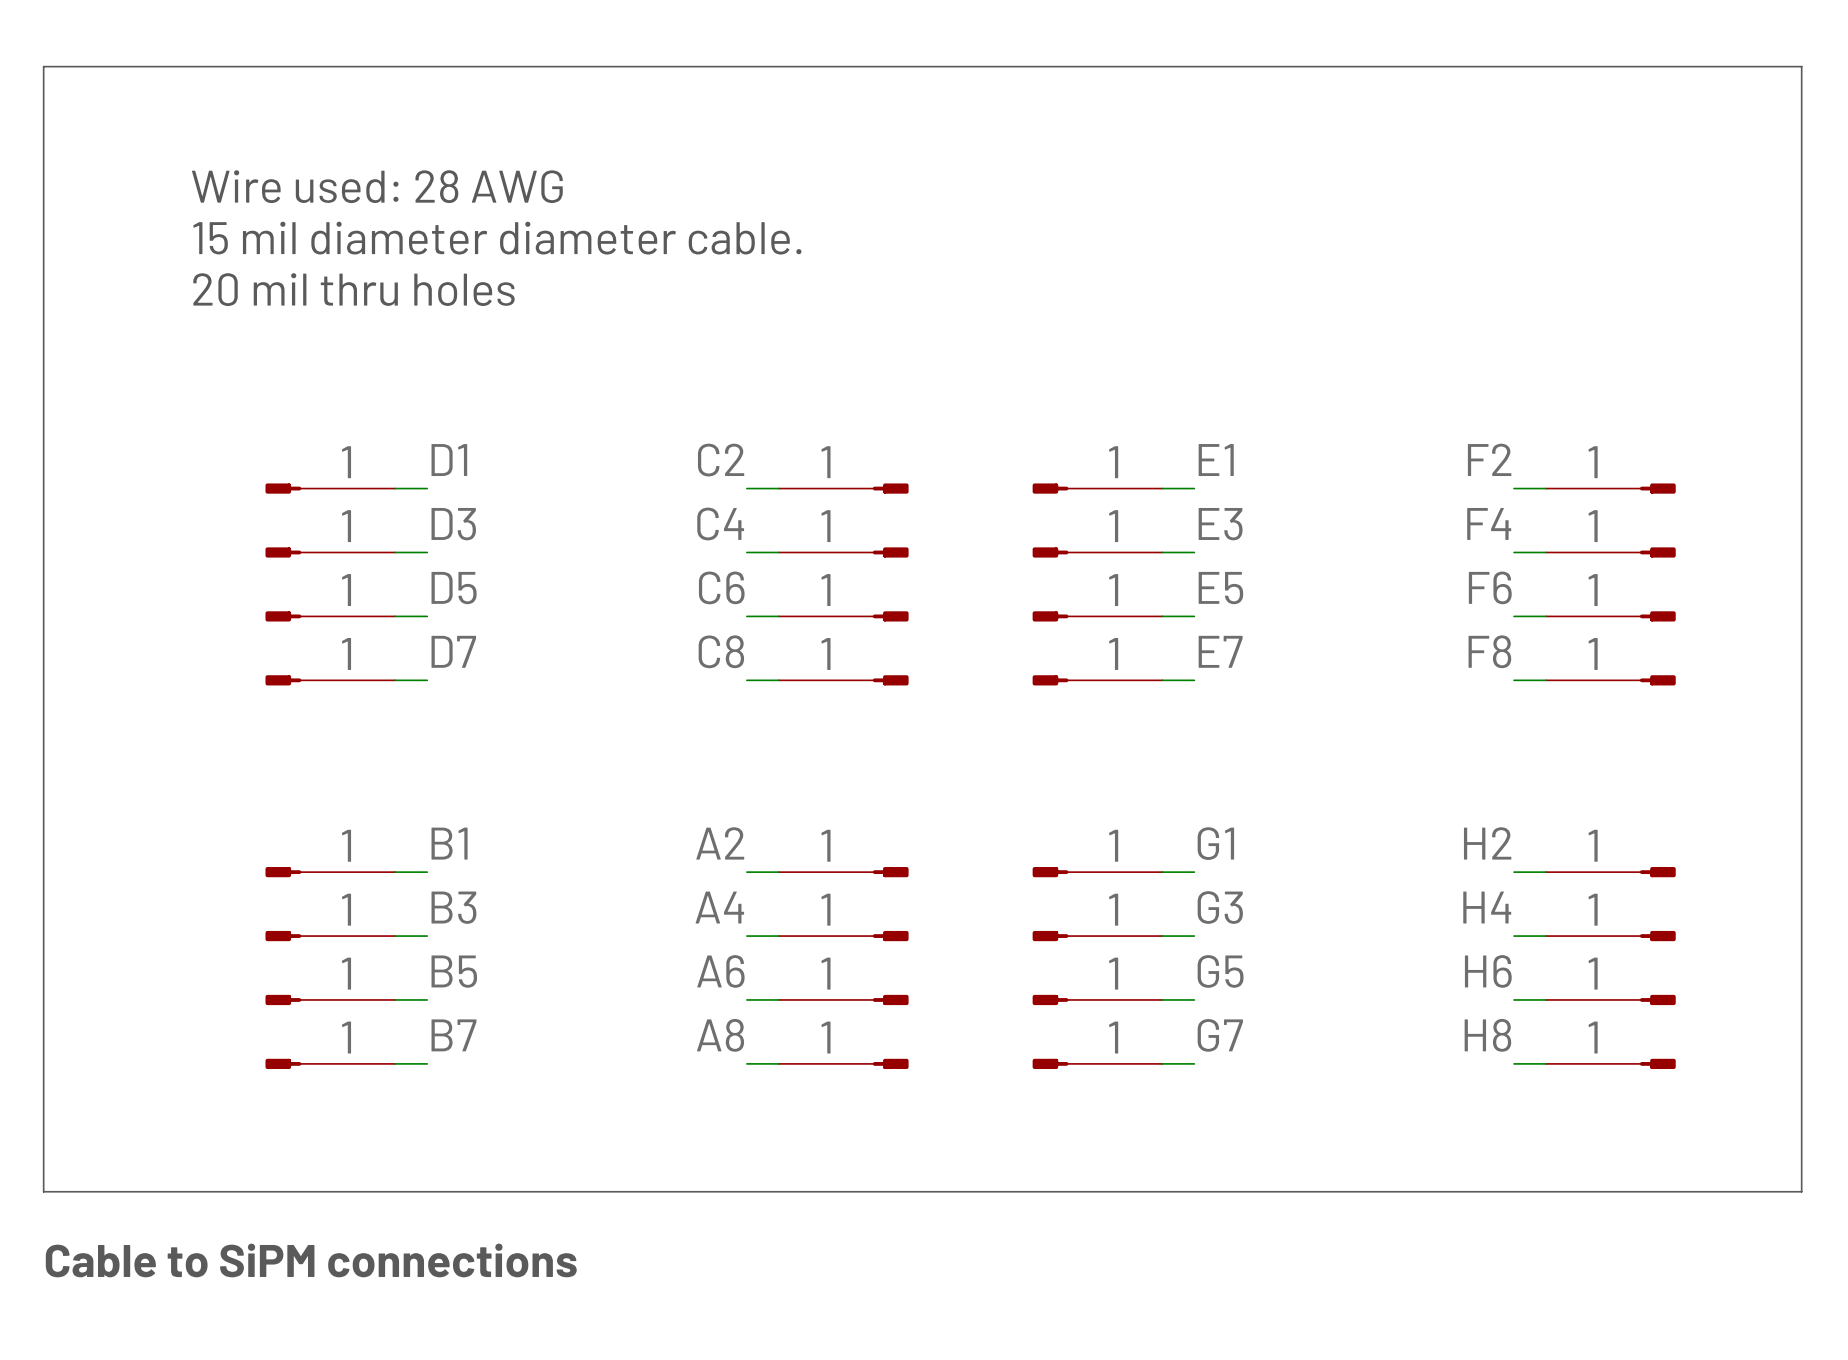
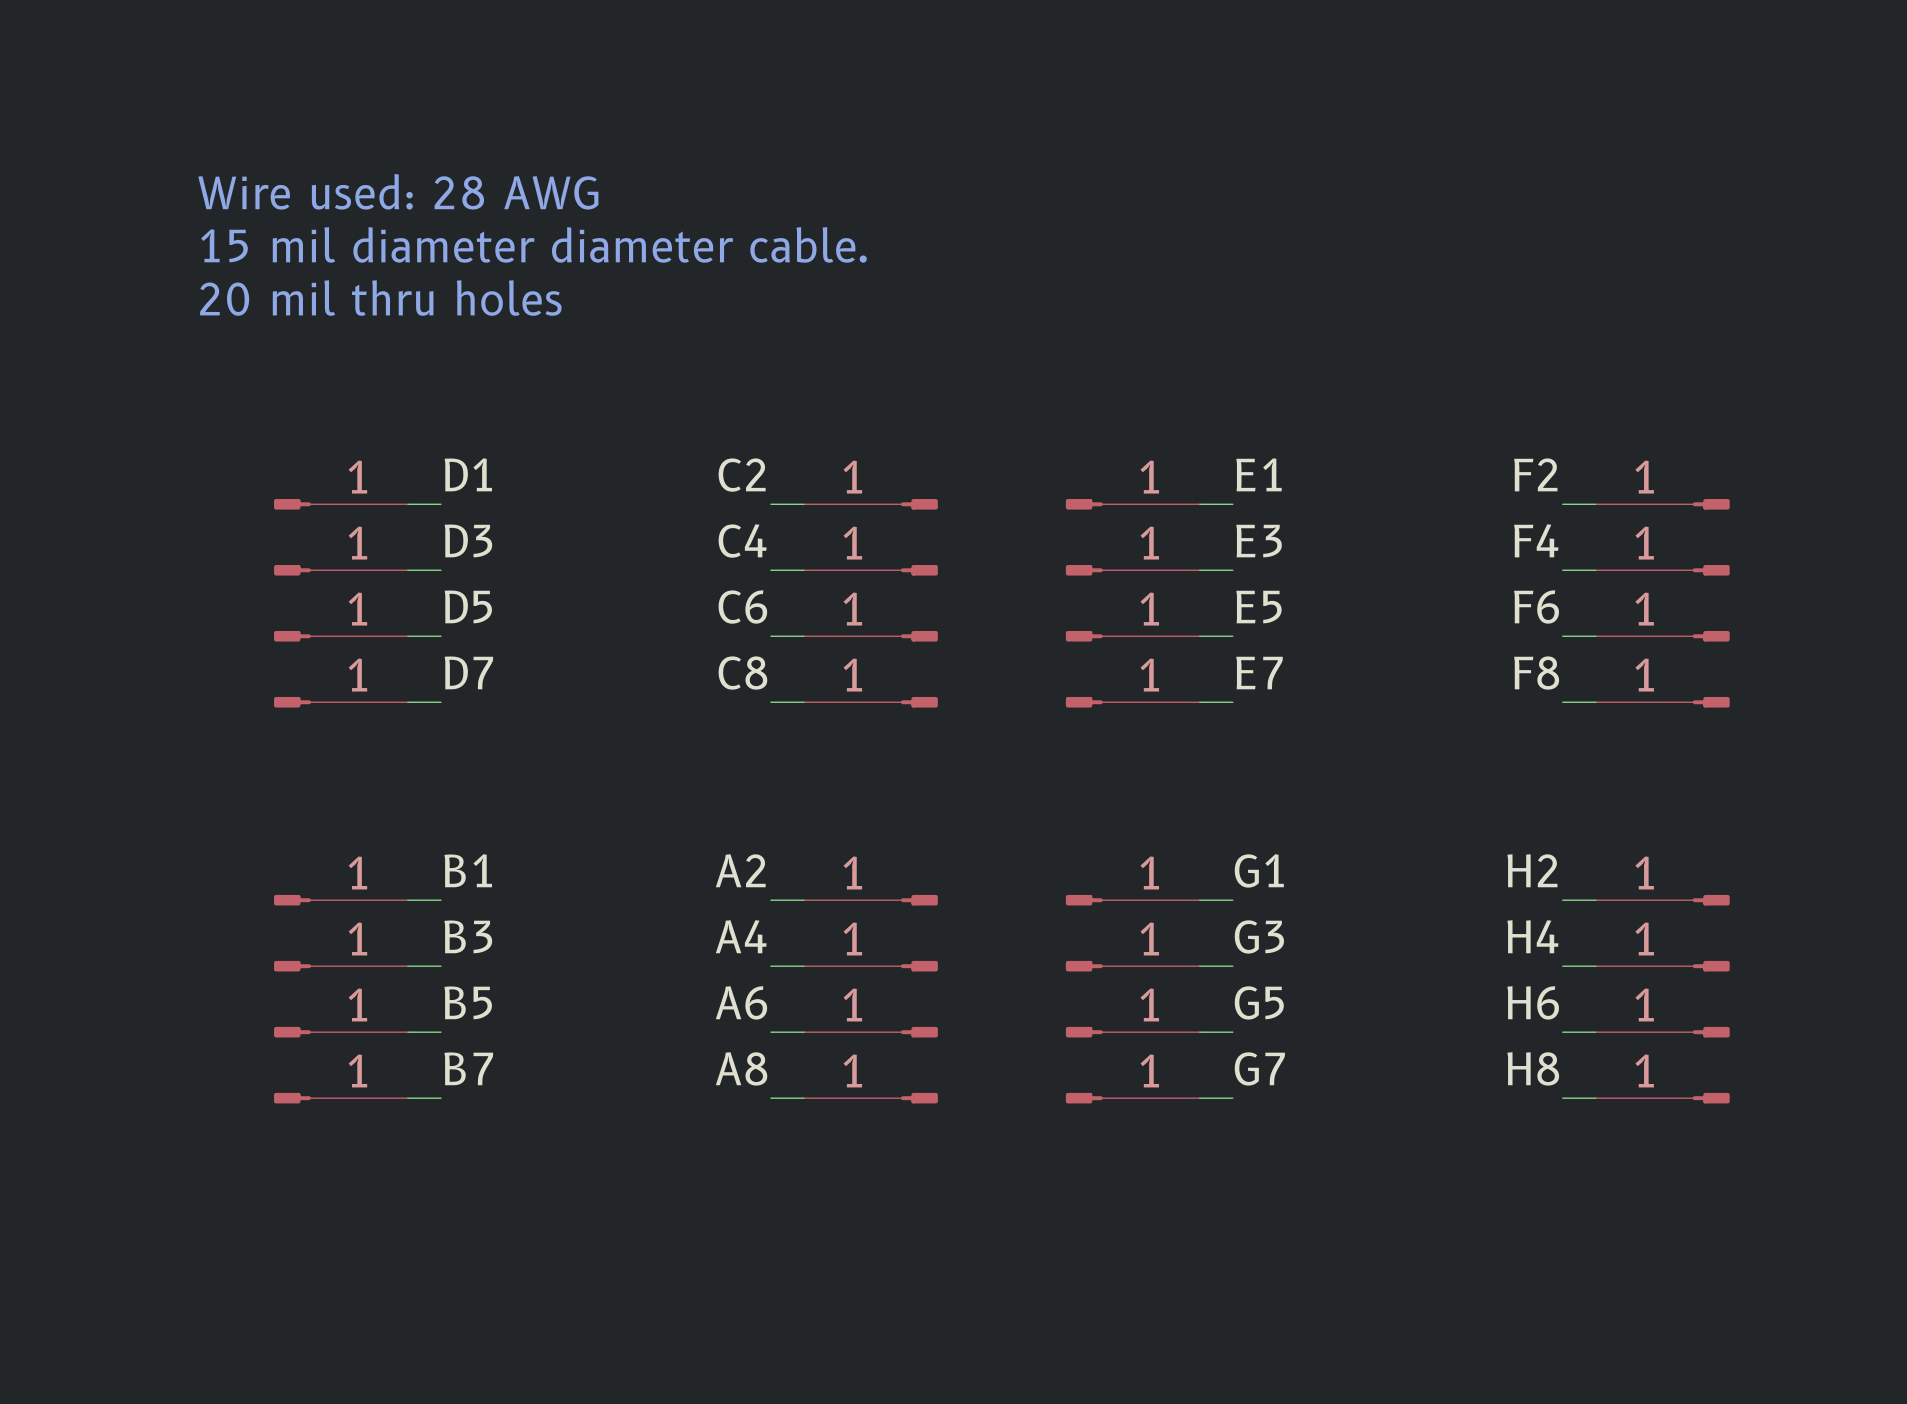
line: (43, 66) (43, 1191) (1801, 1191) (1801, 66) (43, 66) -> none
text: Cable to SiPM connections (311, 1260) -> none

